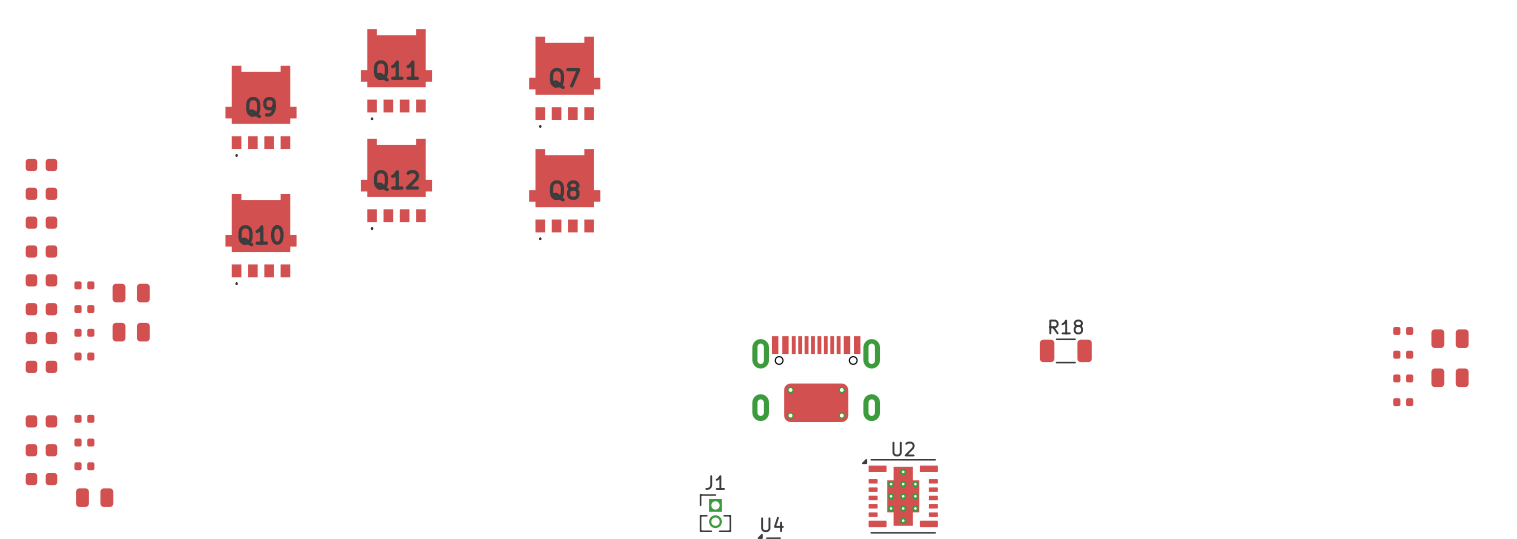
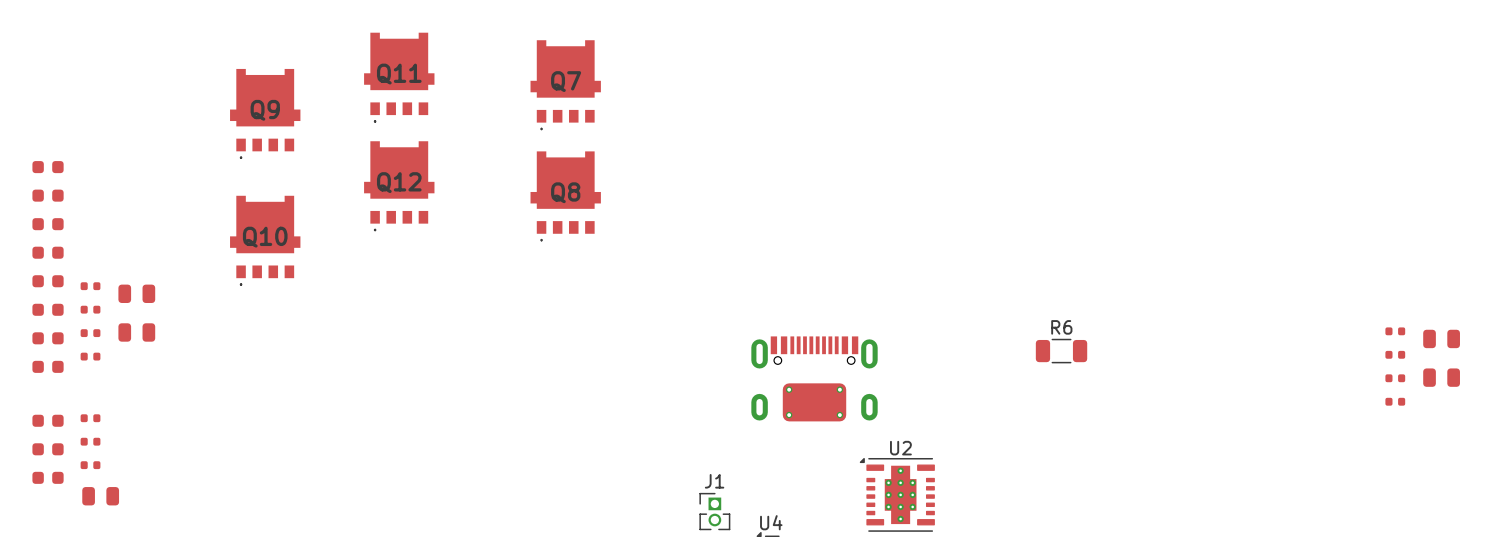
R18 name: R18 (1066, 326) -> R6 (1061, 327)

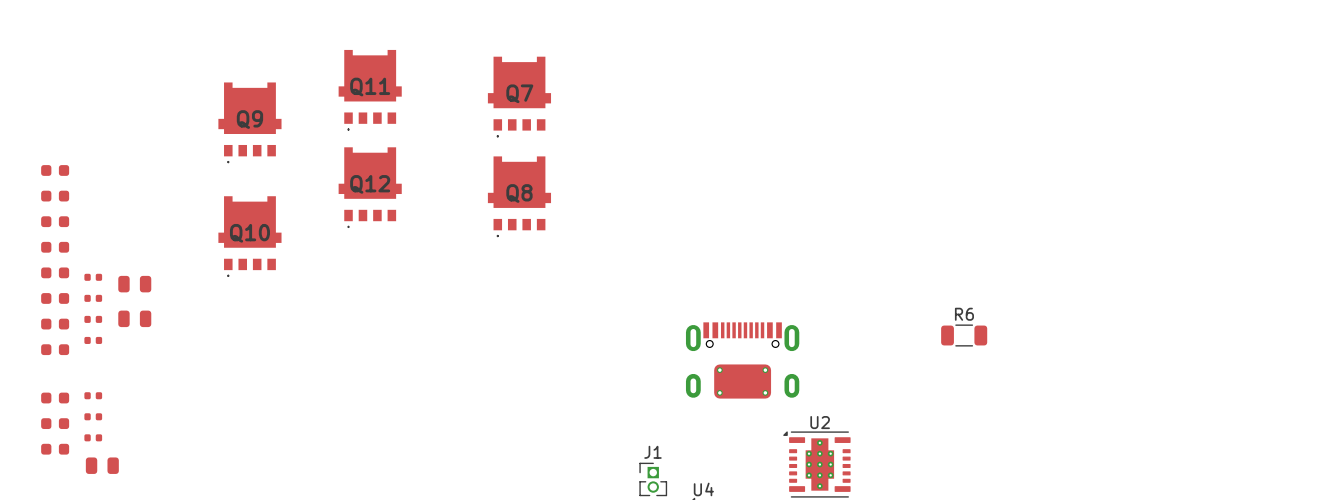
part: (1395, 331) -> none
part: (1441, 338) -> none
part: (1395, 354) -> none
part: (1441, 377) -> none
part: (1395, 378) -> none
part: (1395, 401) -> none

